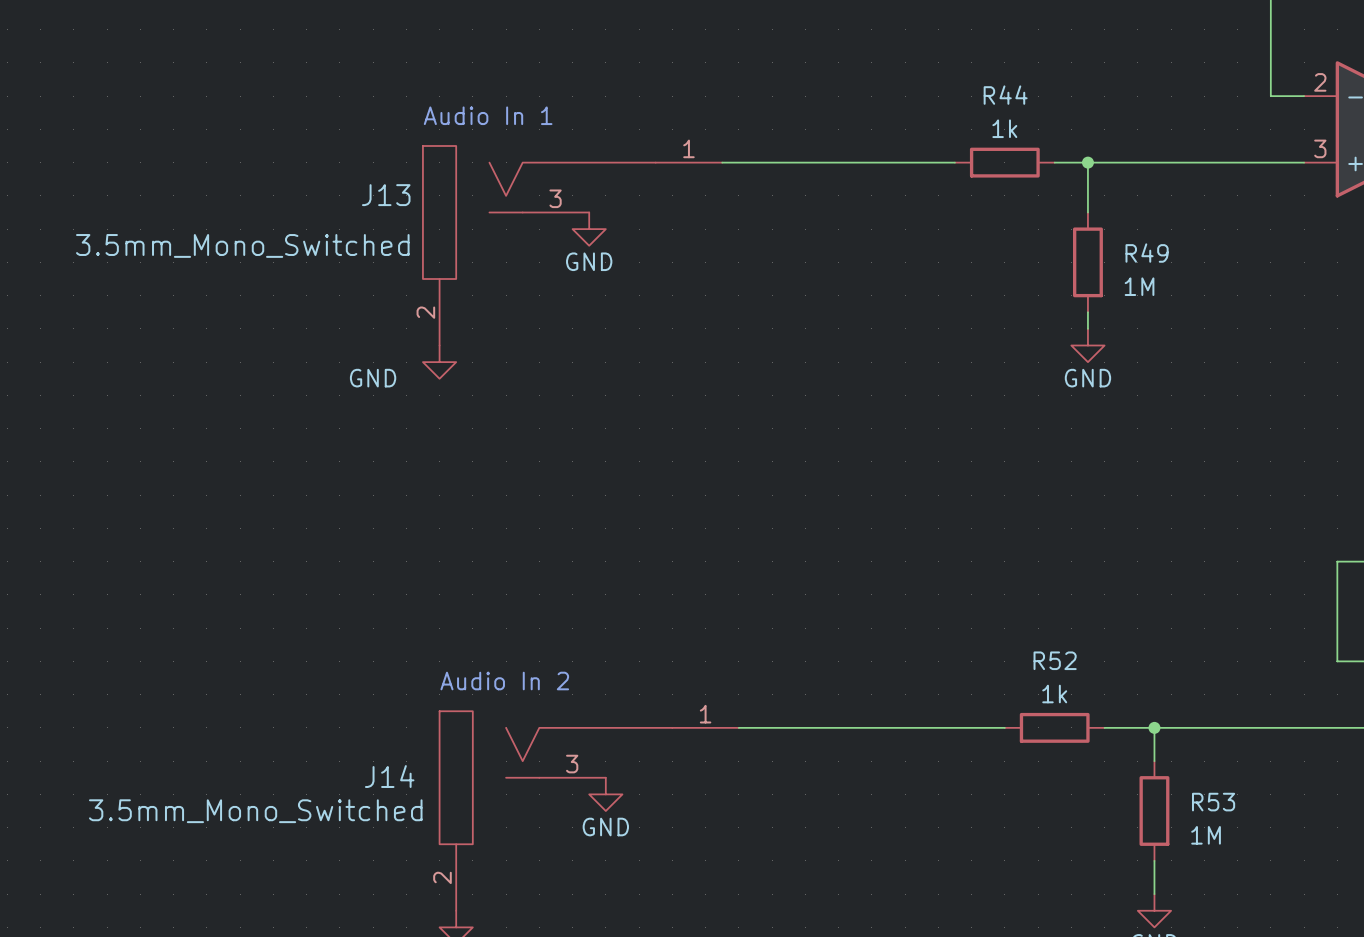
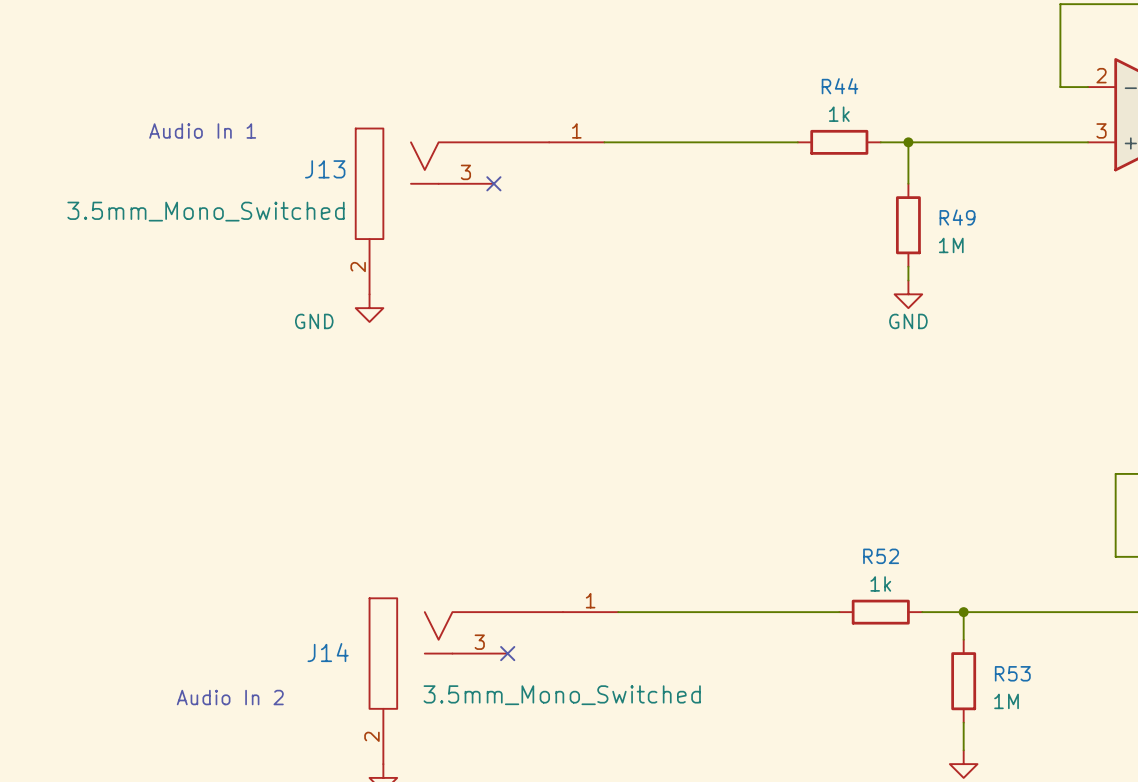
text position: Audio In 1 (488, 115) -> Audio In 1 (202, 131)
no-connect mark: none -> (493, 183)
power symbol: GND (589, 229) -> none
text position: Audio In 2 (504, 681) -> Audio In 2 (230, 697)
no-connect mark: none -> (507, 653)
power symbol: GND (605, 794) -> none
J14 value position: 3.5mm_Mono_Switched (255, 811) -> 3.5mm_Mono_Switched (562, 695)

